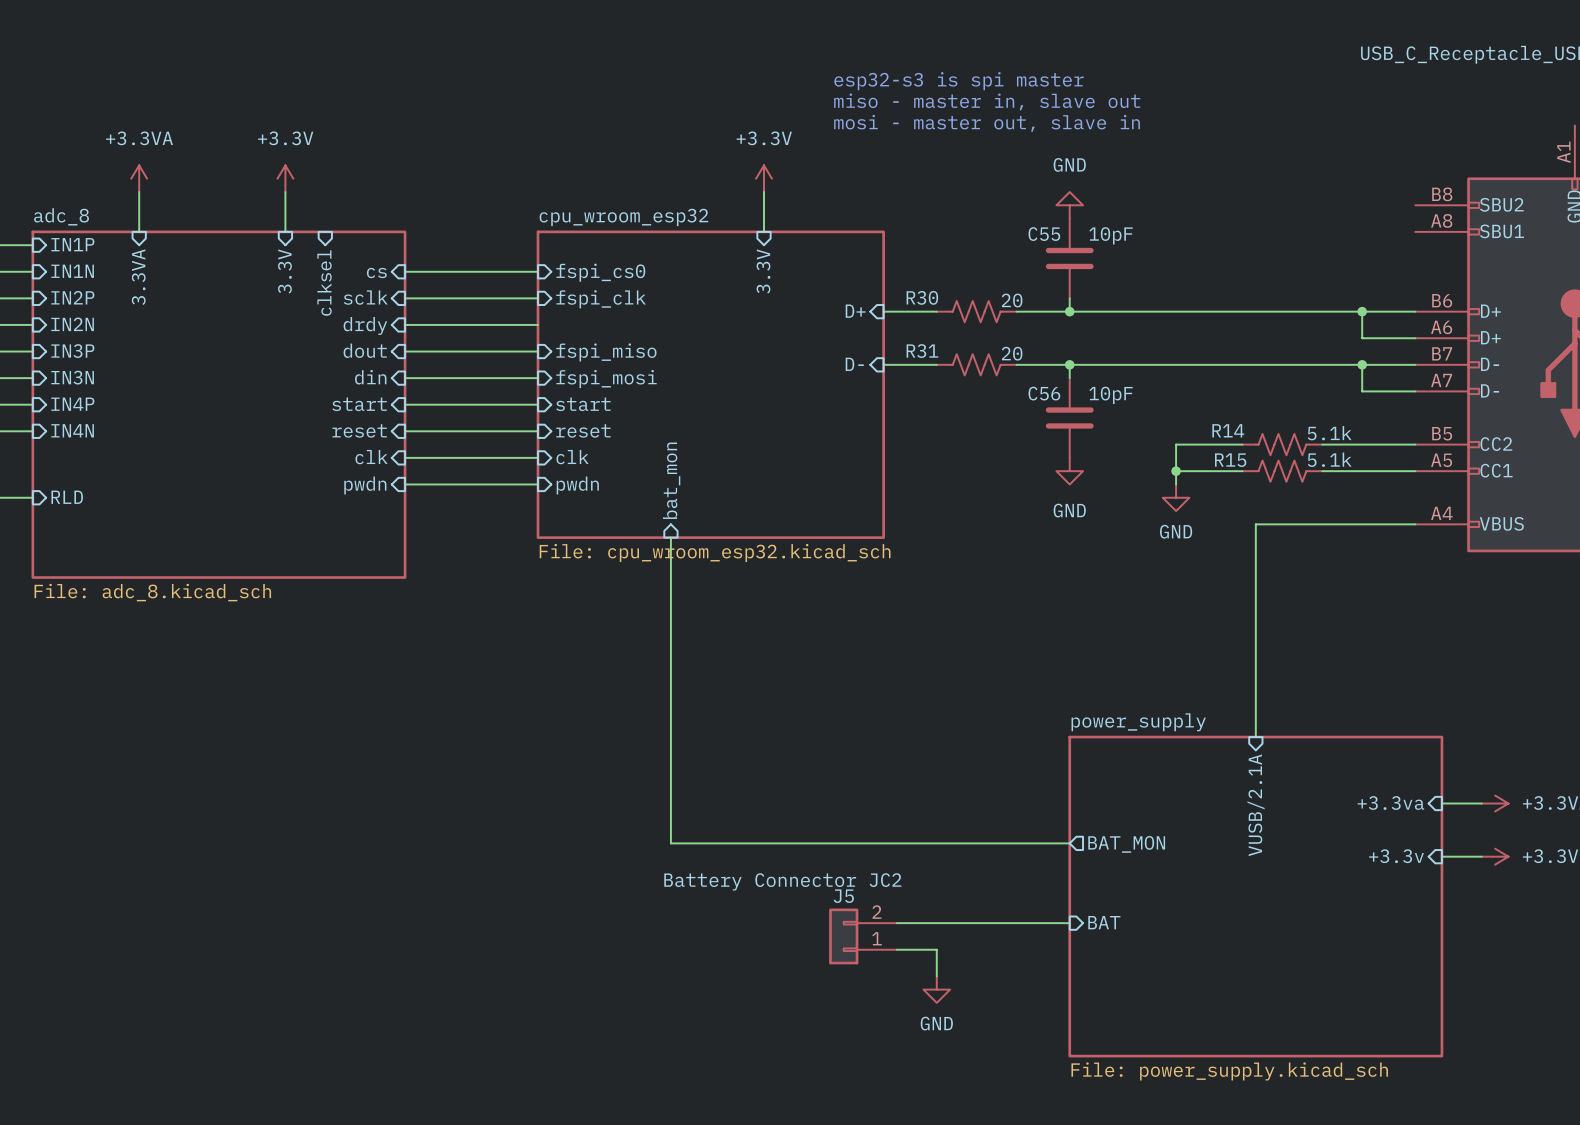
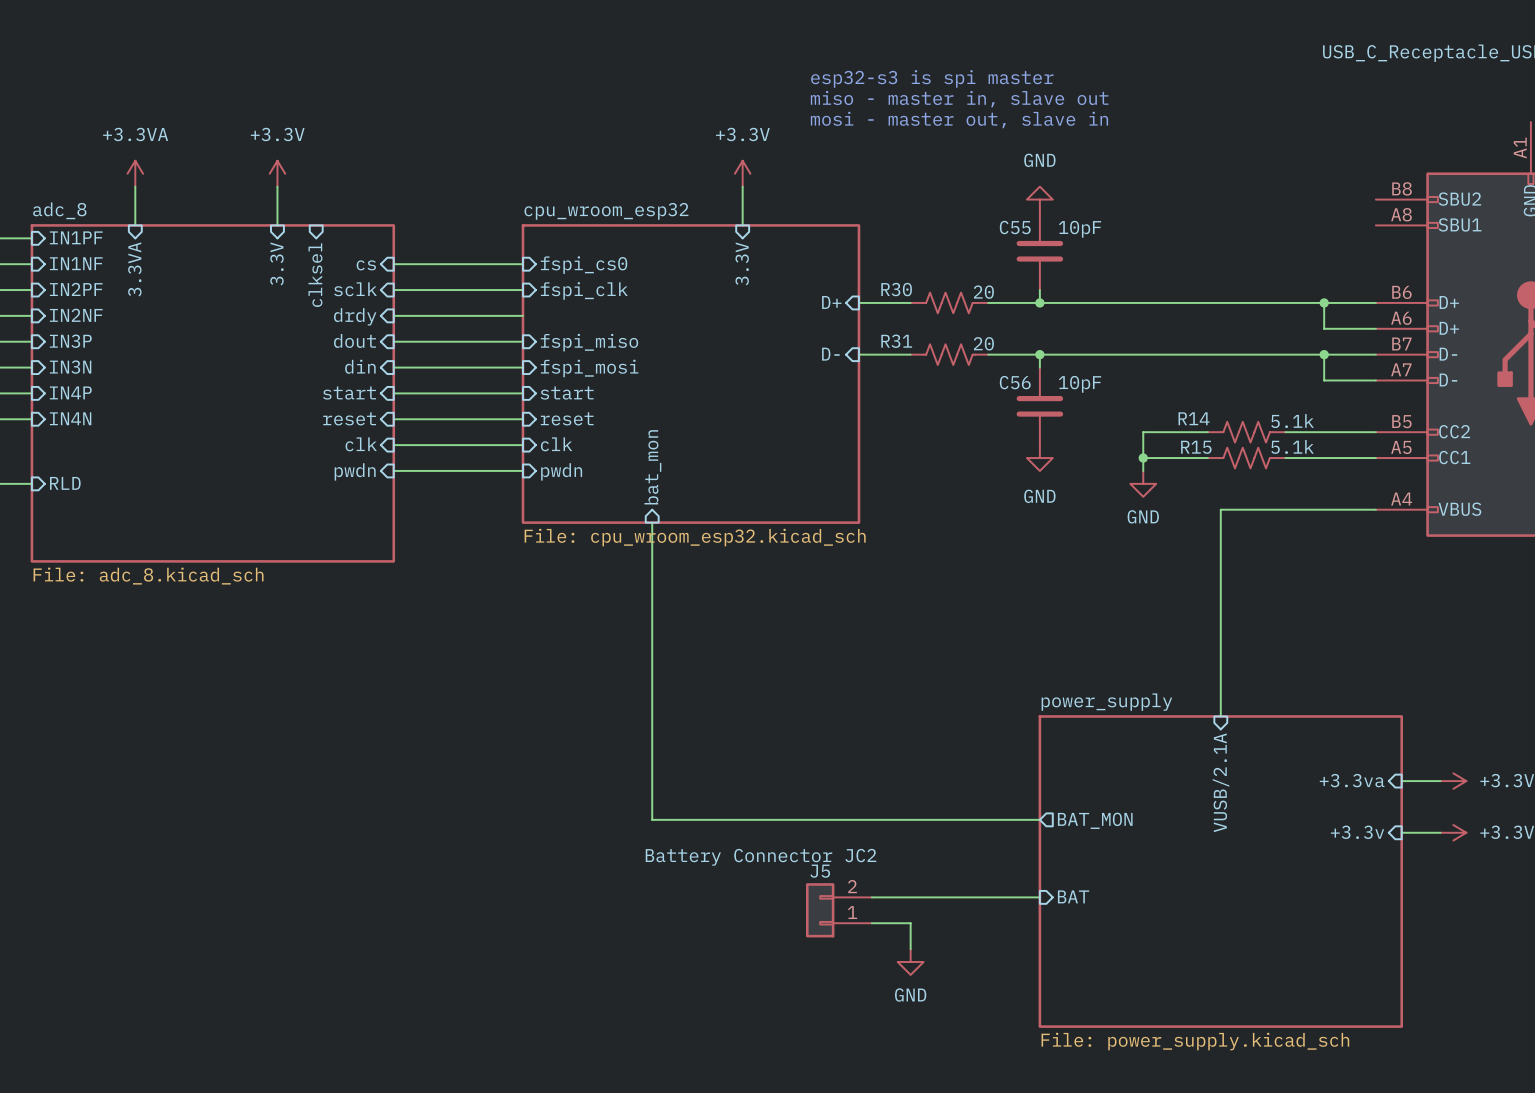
sheet pin: IN1P (72, 244) -> IN1PF (76, 237)
sheet pin: IN1N (72, 271) -> IN1NF (76, 263)
sheet pin: IN2P (72, 297) -> IN2PF (76, 289)
sheet pin: IN2N (72, 324) -> IN2NF (76, 315)

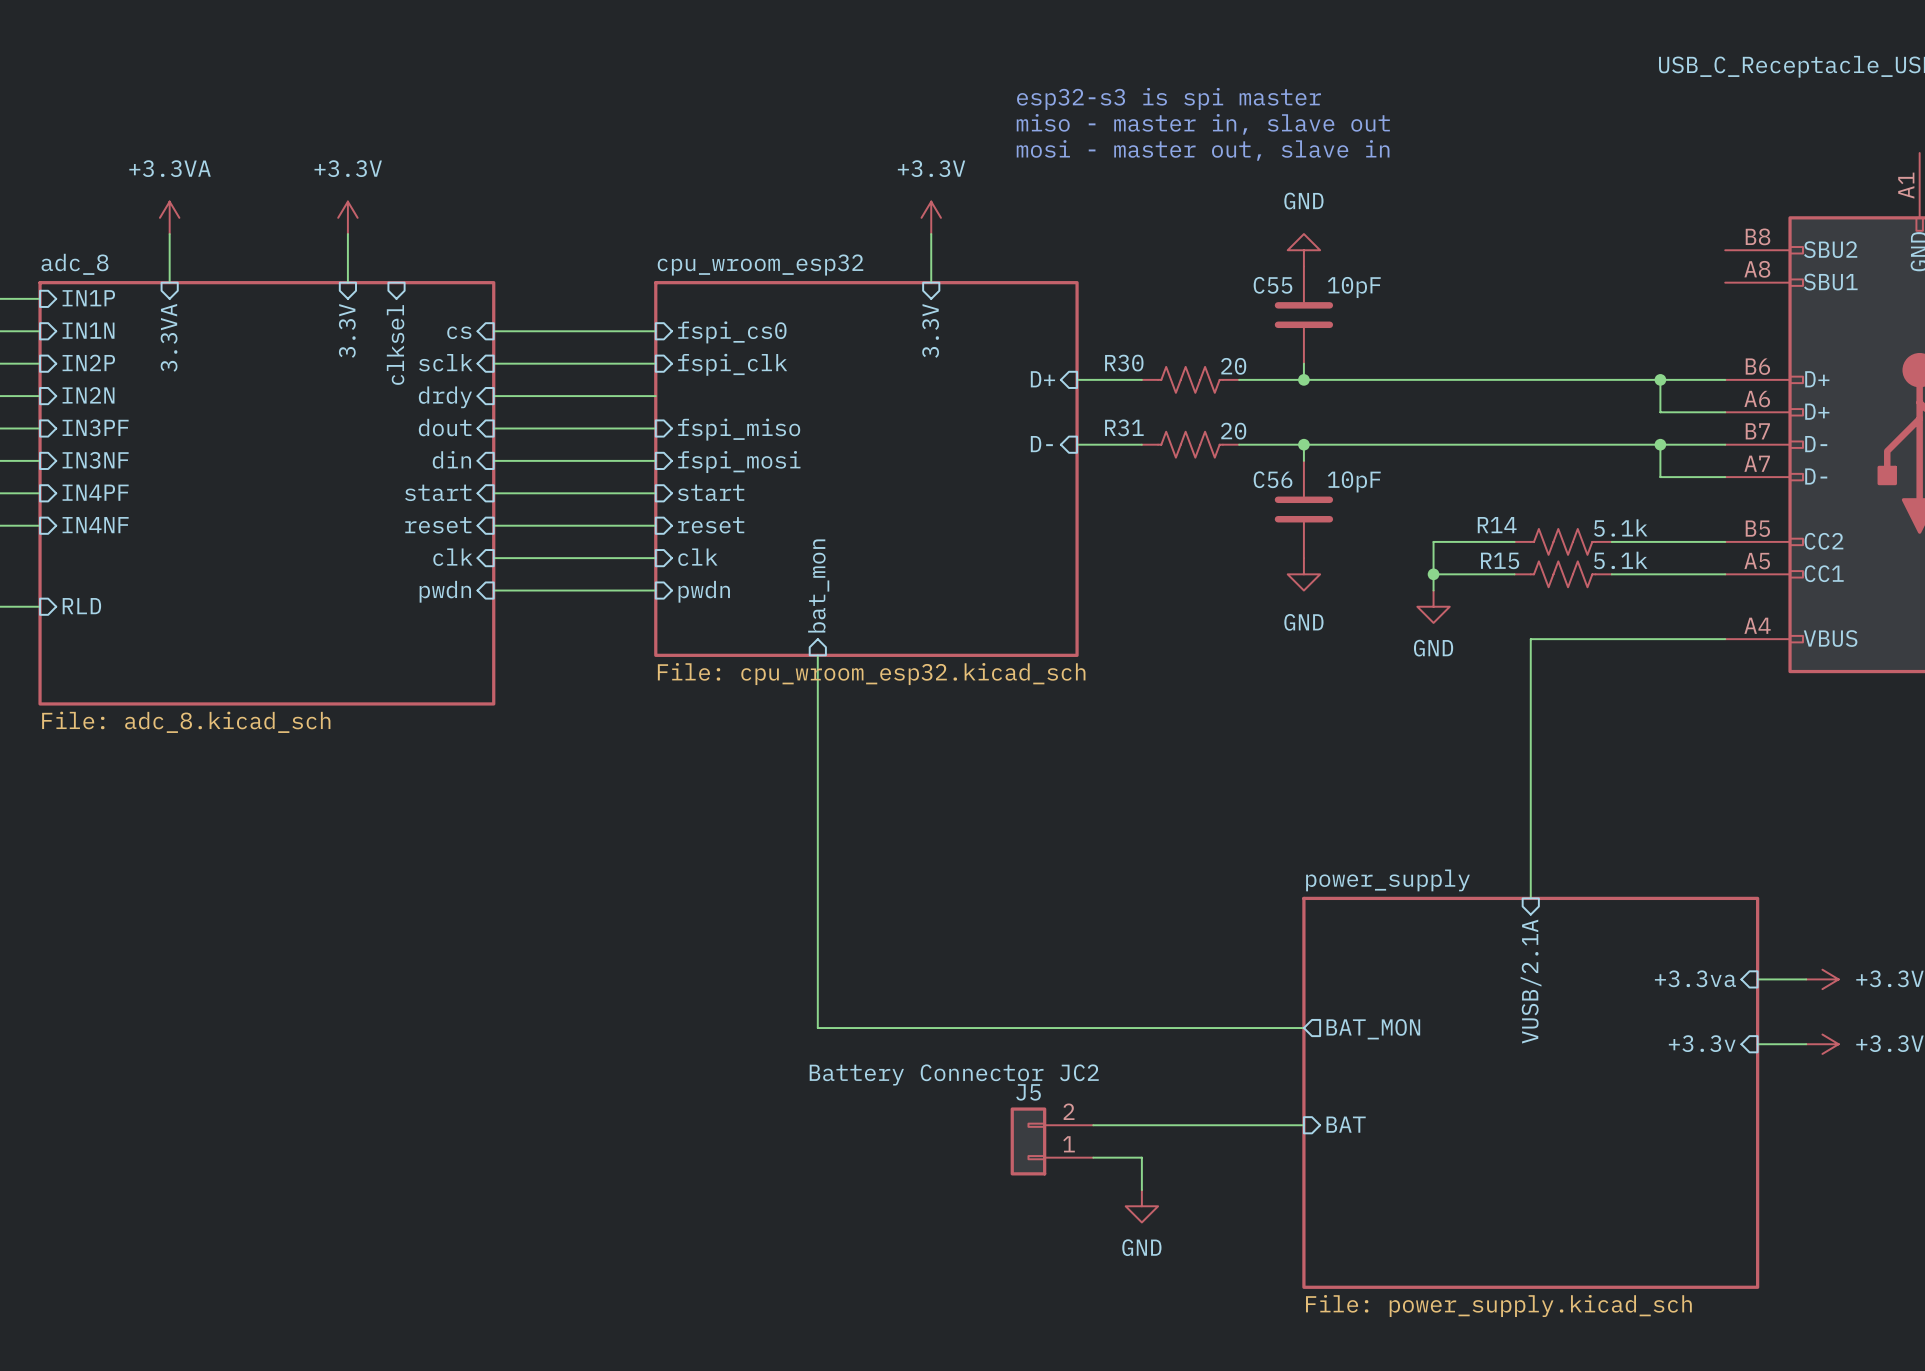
sheet pin: IN1PF (76, 237) -> IN1P (88, 298)
sheet pin: IN1NF (76, 263) -> IN1N (88, 330)
sheet pin: IN2PF (76, 289) -> IN2P (88, 362)
sheet pin: IN2NF (76, 315) -> IN2N (88, 395)
sheet pin: IN3P (70, 341) -> IN3PF (95, 427)
sheet pin: IN3N (70, 367) -> IN3NF (95, 460)
sheet pin: IN4P (70, 392) -> IN4PF (95, 492)
sheet pin: IN4N (70, 418) -> IN4NF (95, 525)

